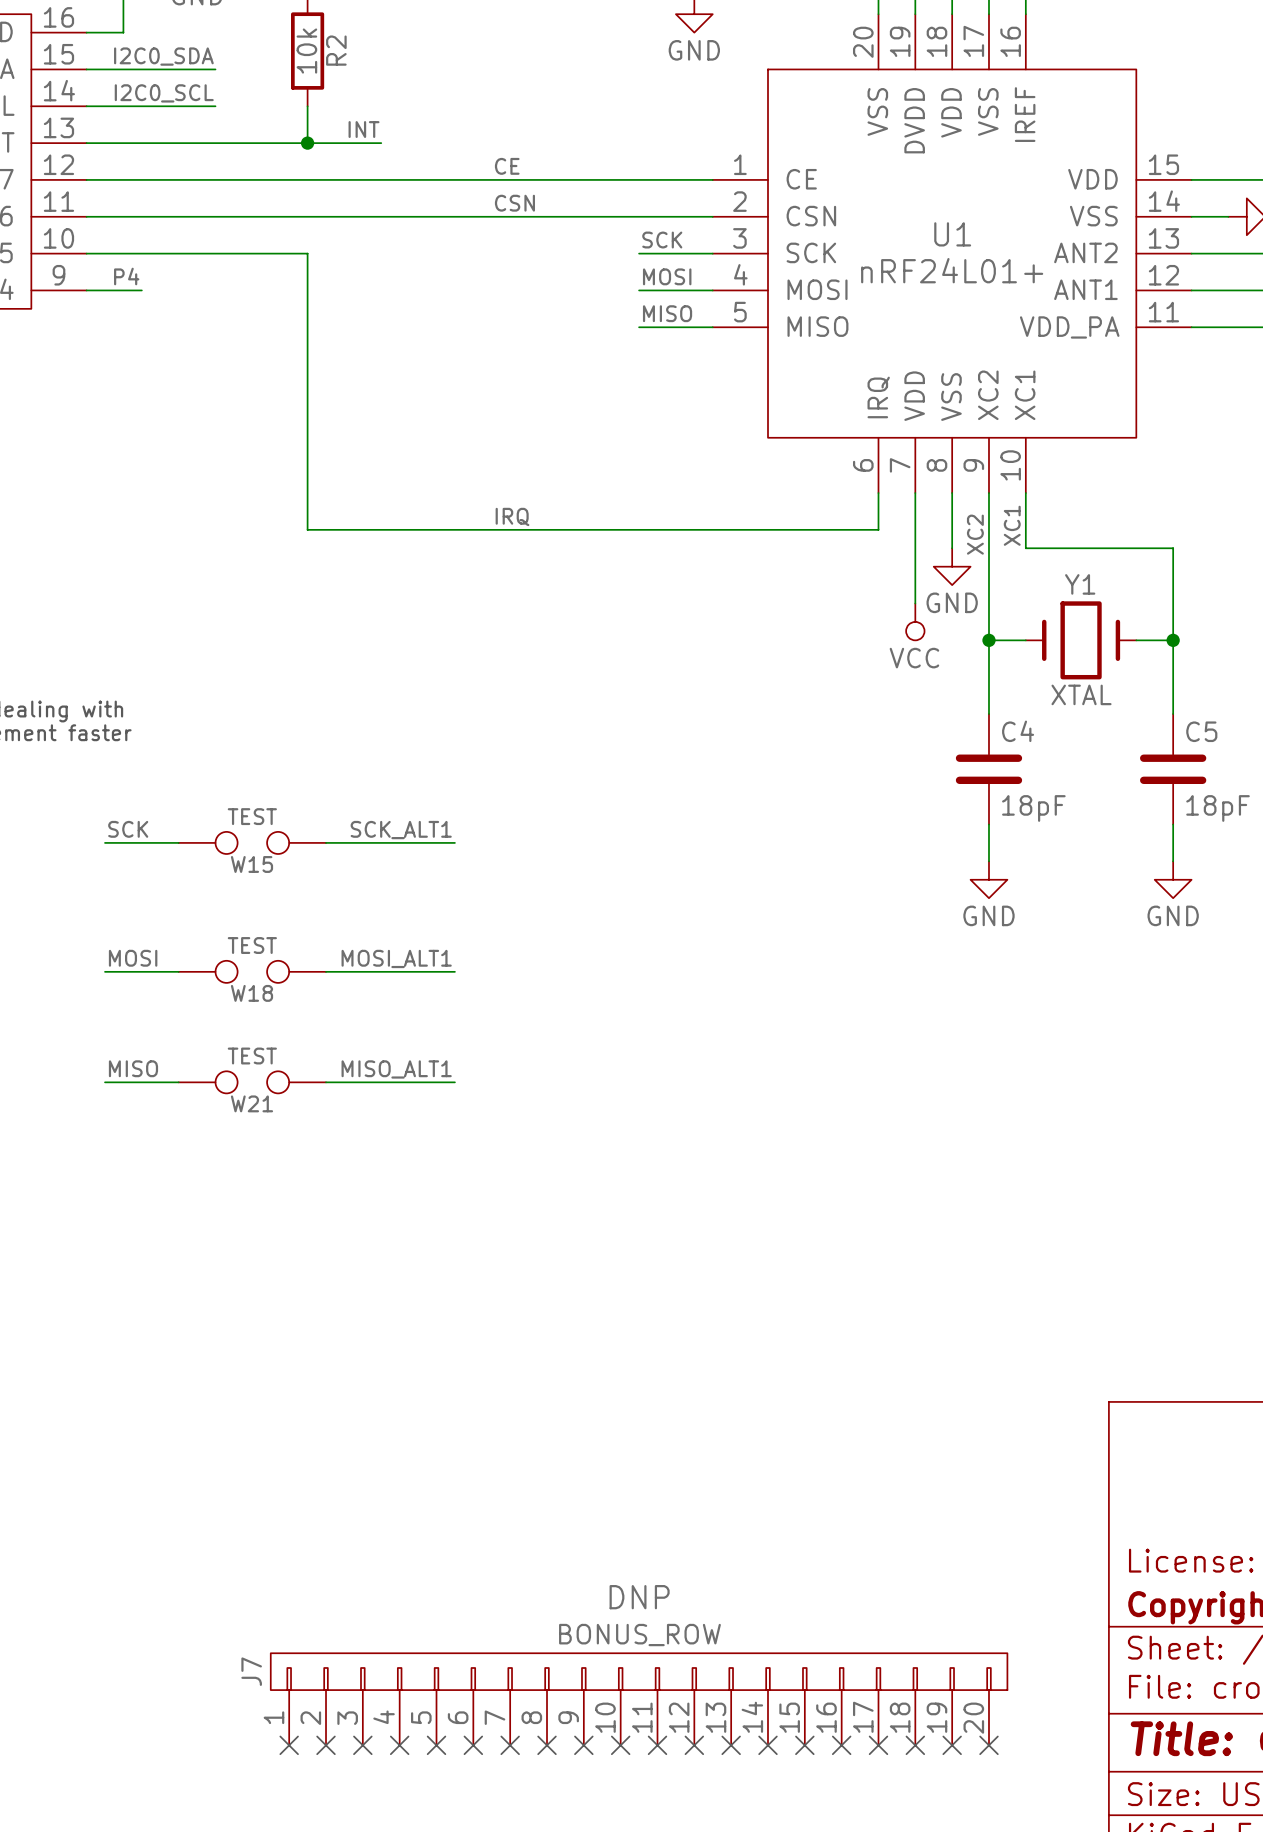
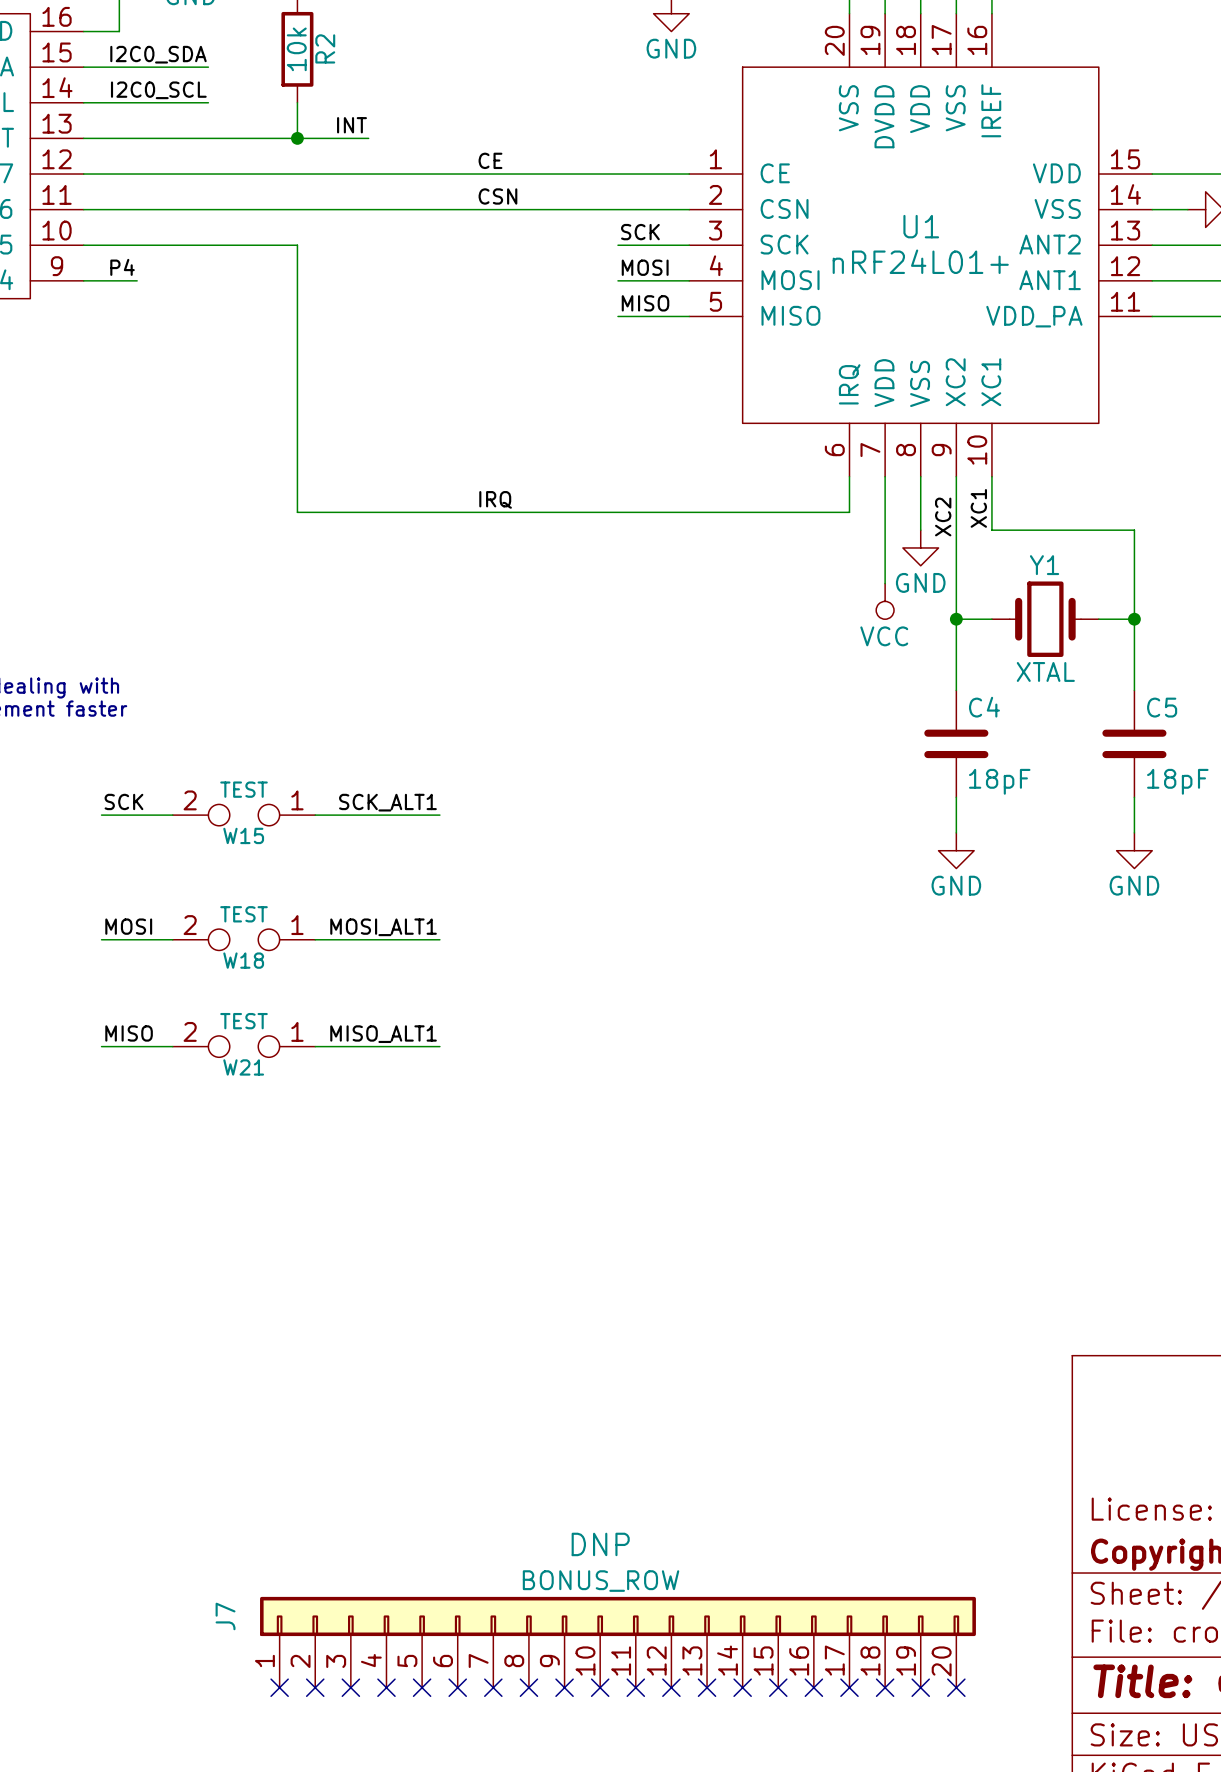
Y1 symbol: [1025, 601, 1137, 680] -> [991, 581, 1099, 657]
W15 pin number: none -> 2 (190, 800)
W15 pin number: none -> 1 (297, 800)
W18 pin number: none -> 2 (190, 925)
W18 pin number: none -> 1 (297, 925)
W21 pin number: none -> 2 (190, 1031)
W21 pin number: none -> 1 (297, 1031)
J7 symbol: [270, 1653, 1008, 1746] -> [260, 1596, 976, 1688]

